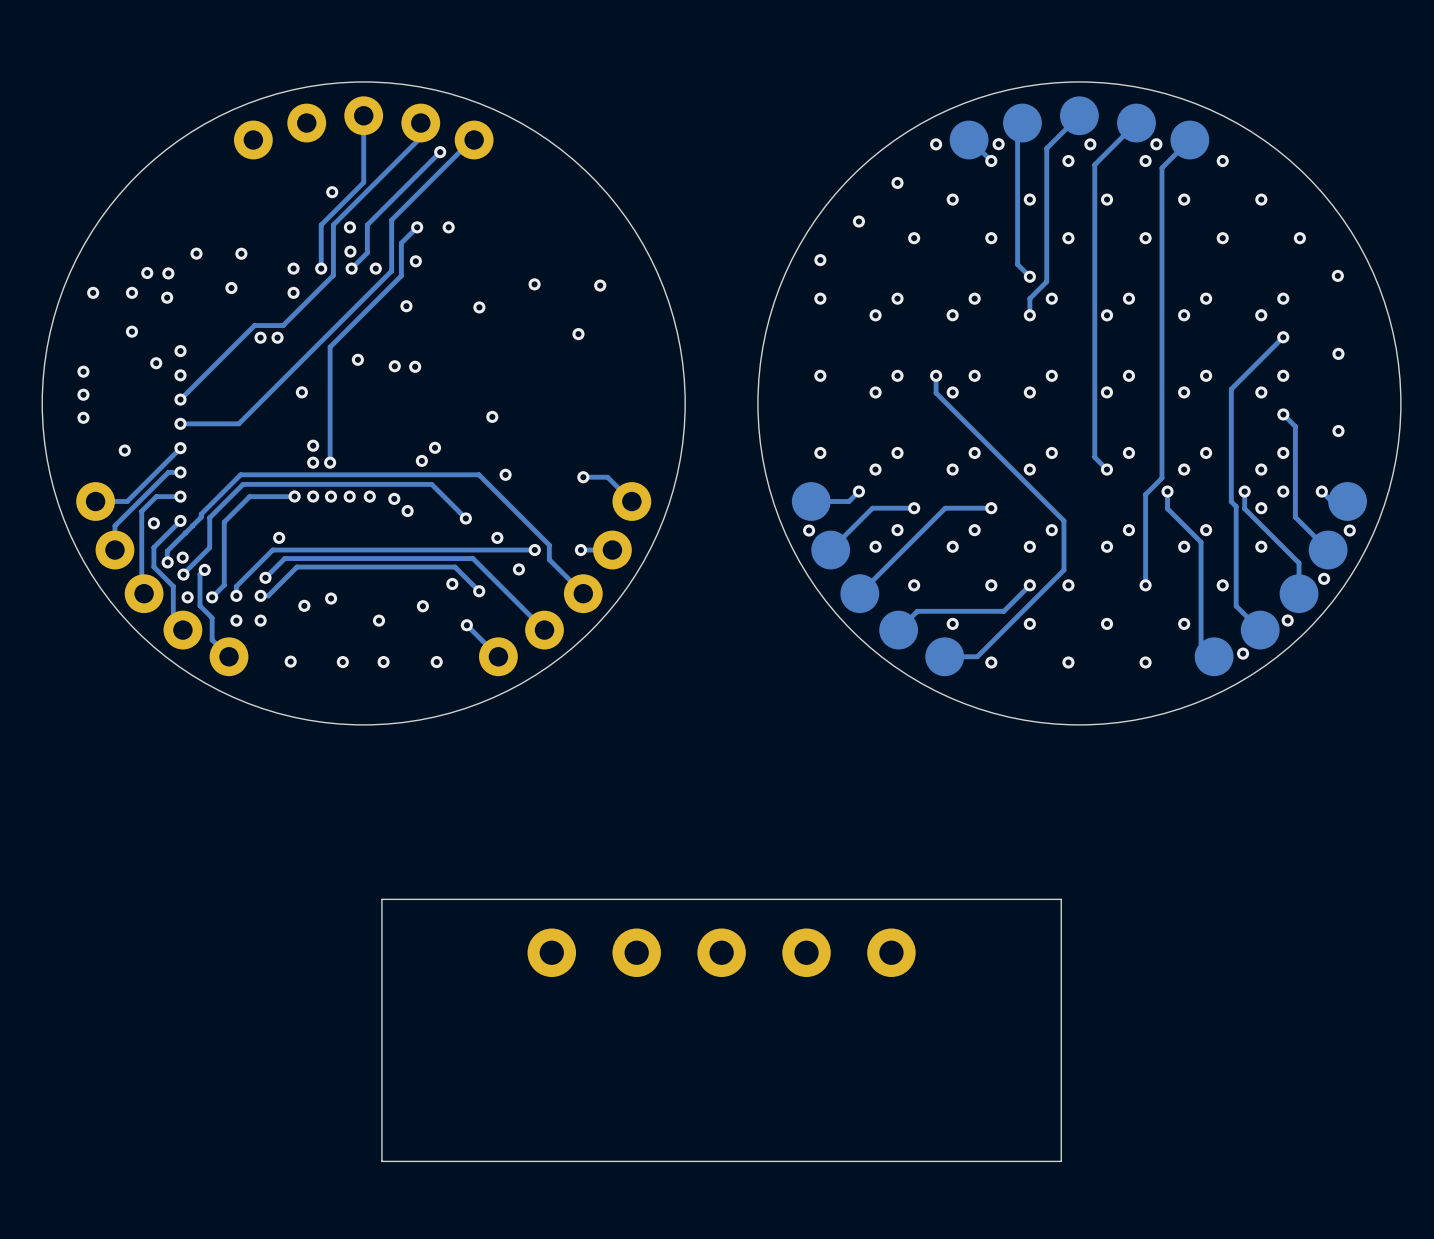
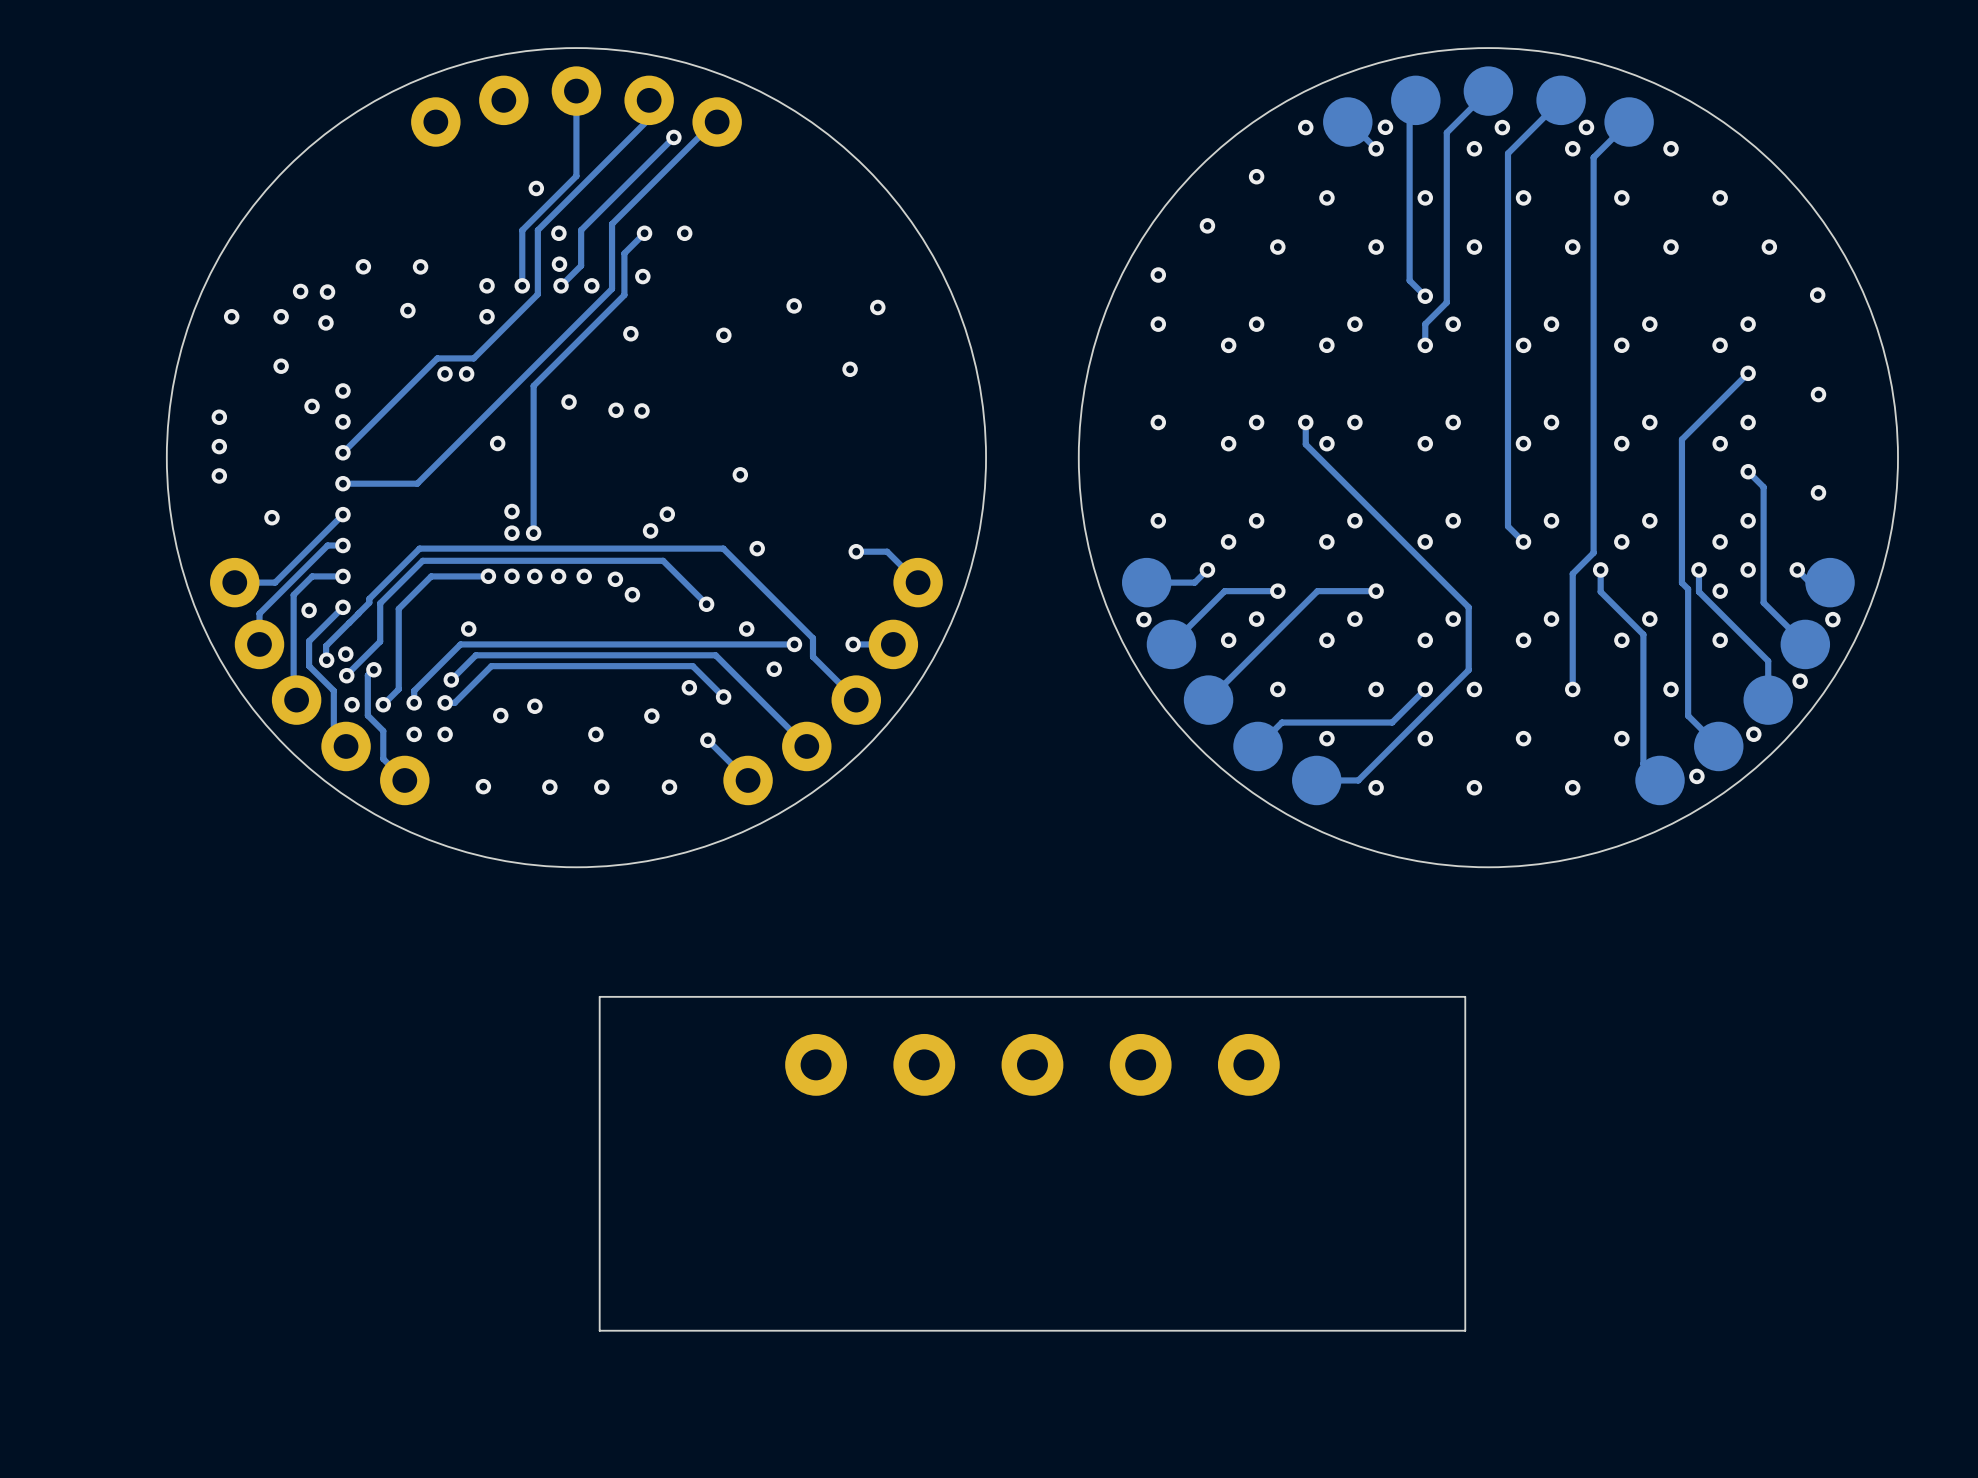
part: none -> (816, 1064)
part: none -> (924, 1064)
part: none -> (1032, 1064)
part: none -> (1140, 1064)
part: none -> (1248, 1064)
board edge: (1061, 899) (381, 899) -> (1465, 1089) (1465, 996) (599, 996) (599, 1089)
part: (551, 952) -> none
part: (636, 952) -> none
part: (721, 952) -> none
part: (806, 952) -> none
part: (891, 952) -> none
board edge: (1061, 1088) (1061, 1161) (381, 1161) (381, 1088) -> (1465, 1330) (599, 1330)

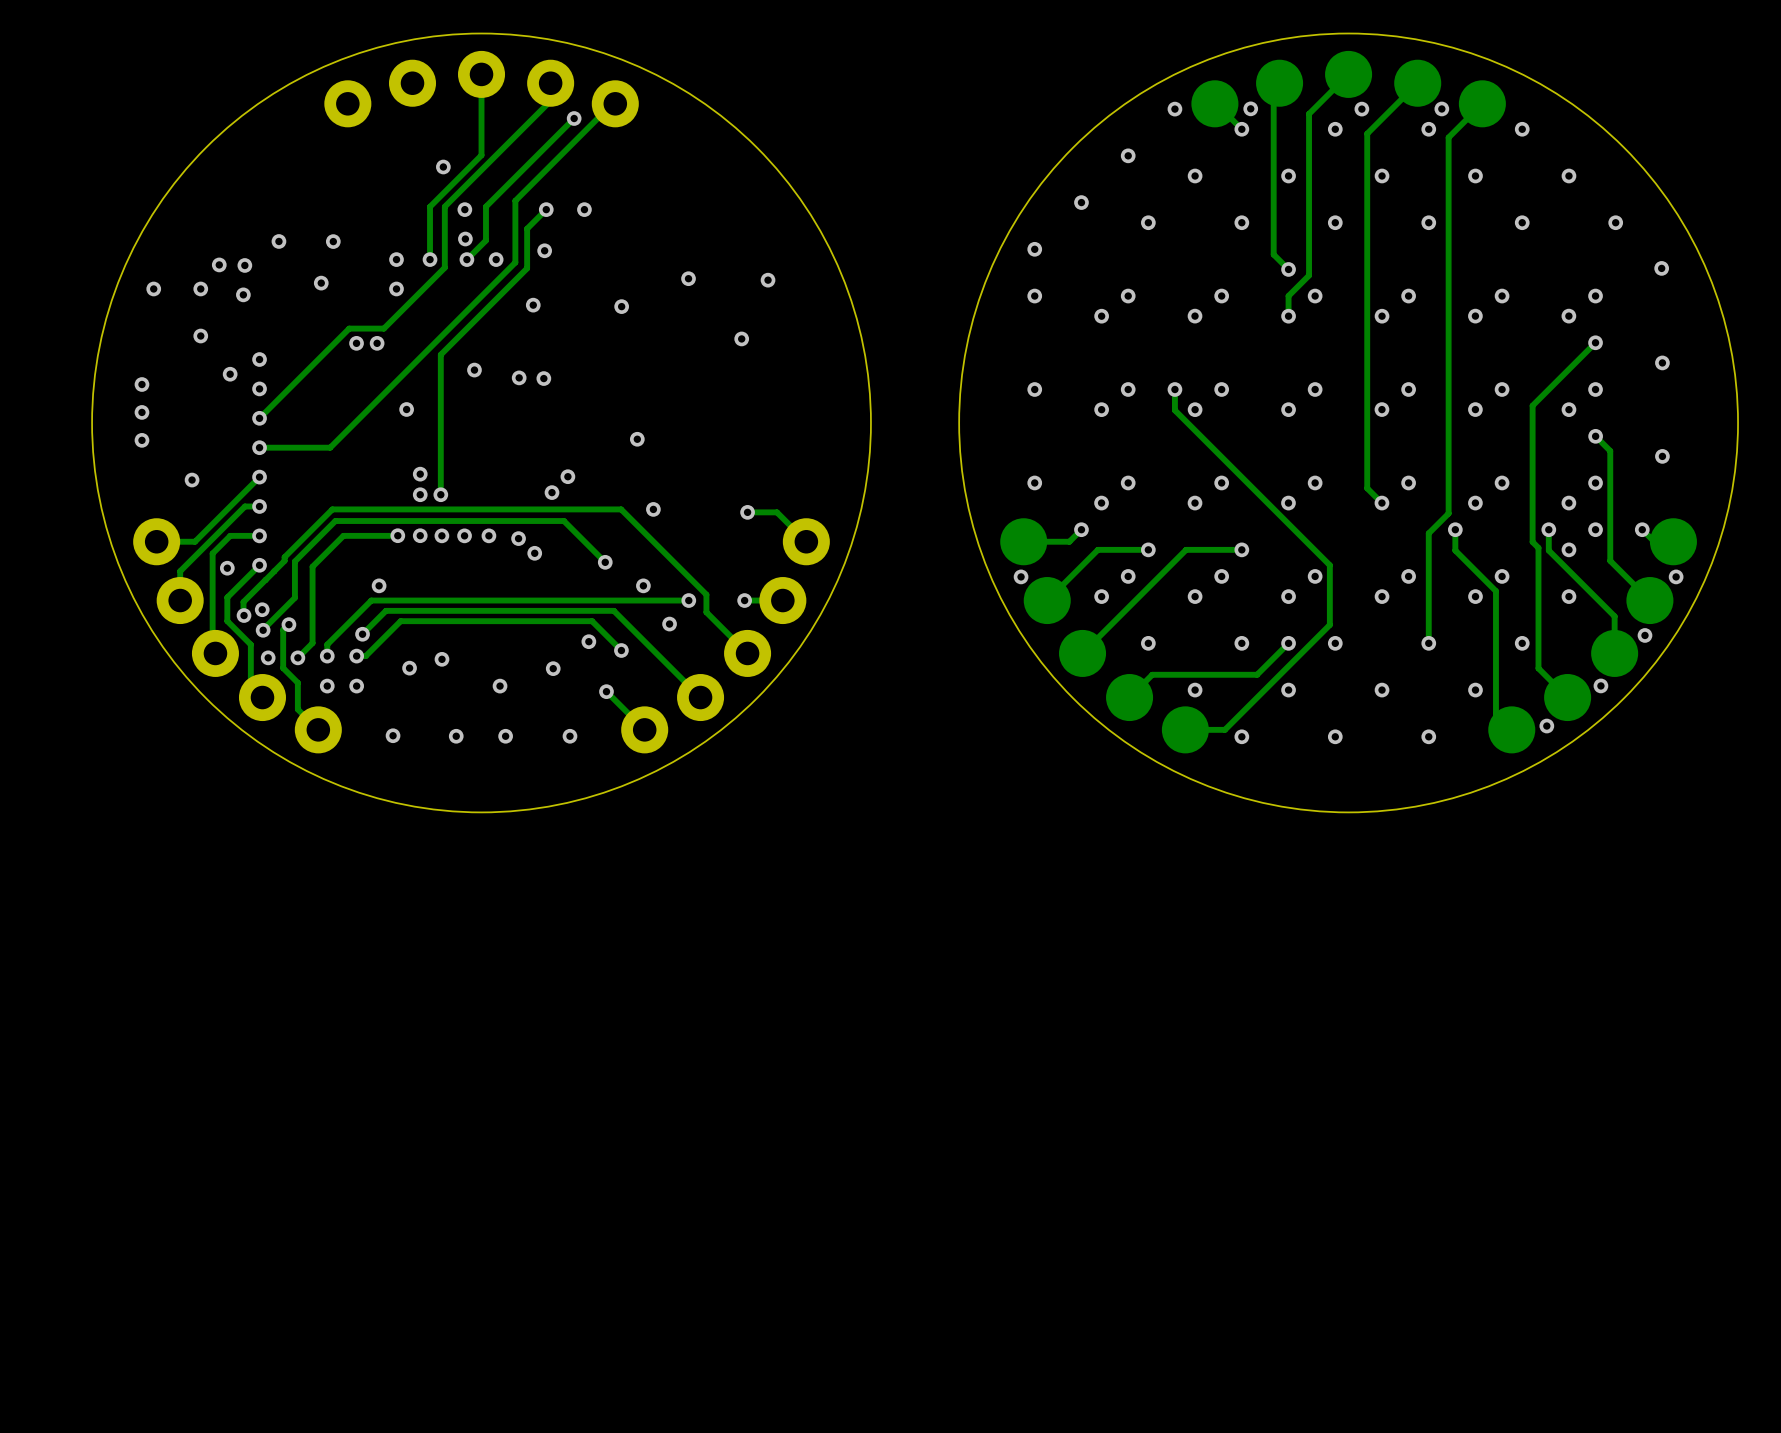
board edge: (1465, 996) (599, 996) (599, 1330) (1465, 1330) (1465, 996) -> none
part: (816, 1064) -> none
part: (924, 1064) -> none
part: (1032, 1064) -> none
part: (1140, 1064) -> none
part: (1248, 1064) -> none

